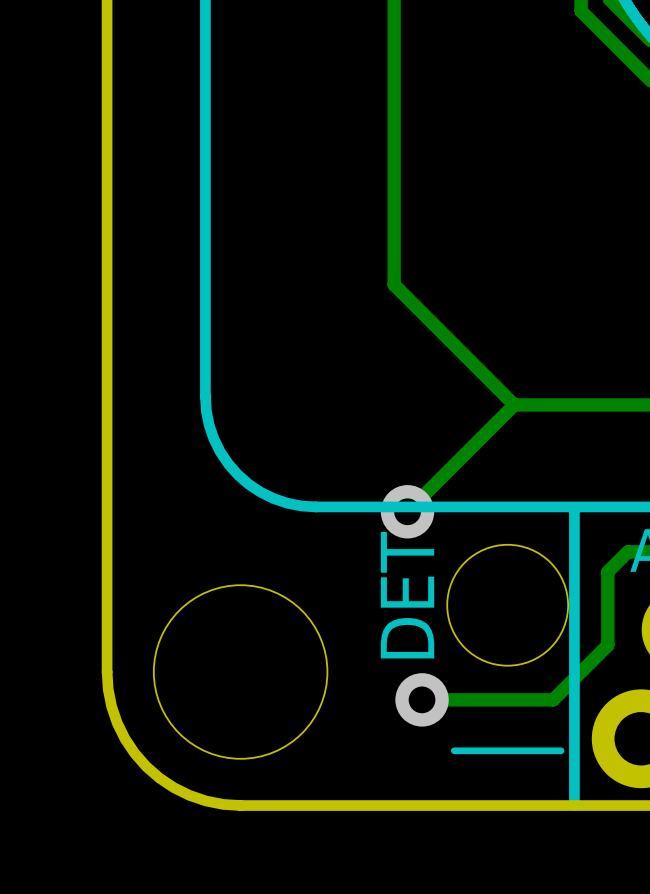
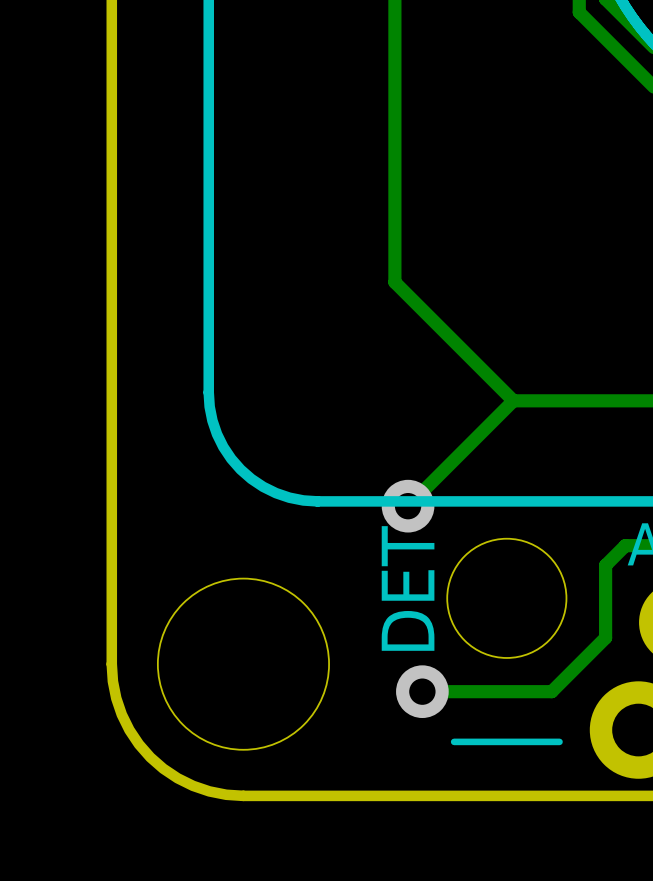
line: (574, 511) (574, 805) -> none

